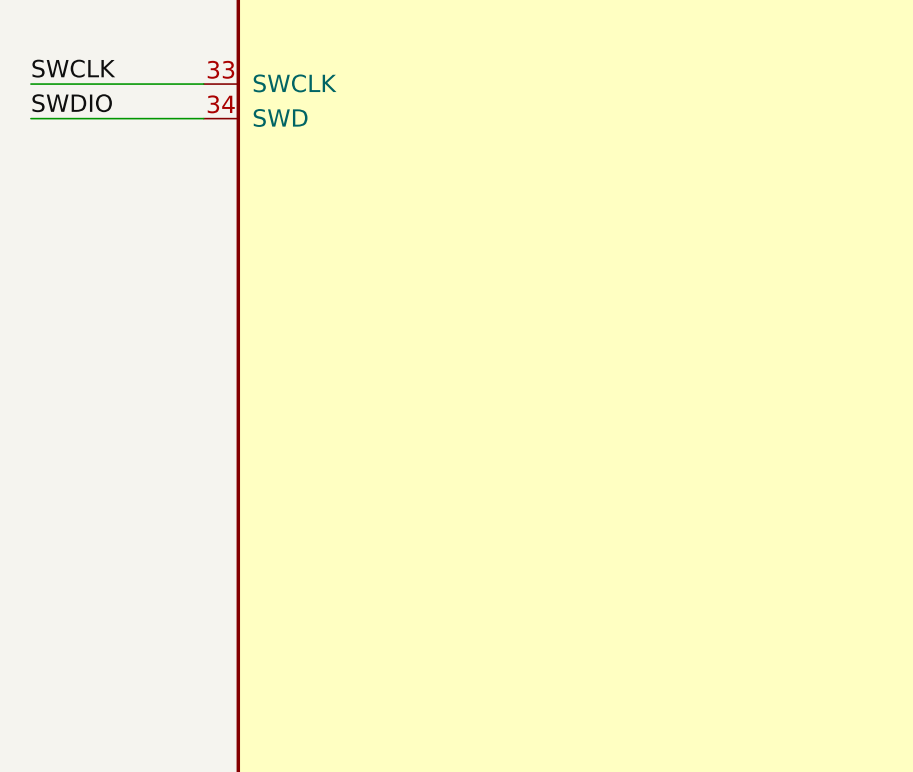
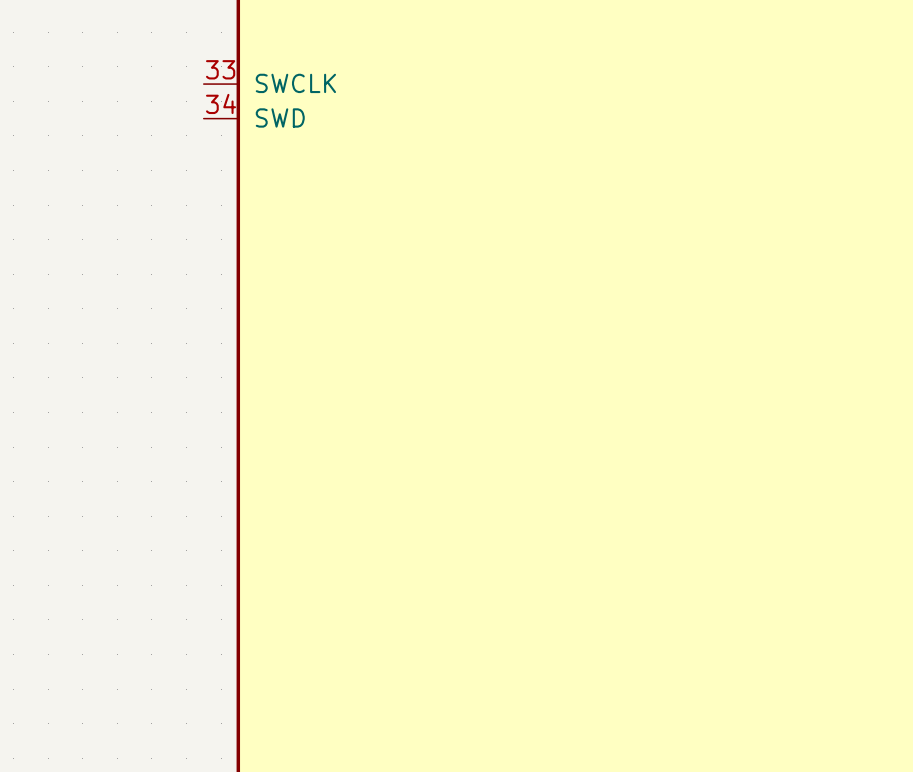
label: SWCLK (73, 68) -> none
wire: (30, 84) (203, 84) -> none
label: SWDIO (72, 103) -> none
wire: (30, 118) (203, 118) -> none

